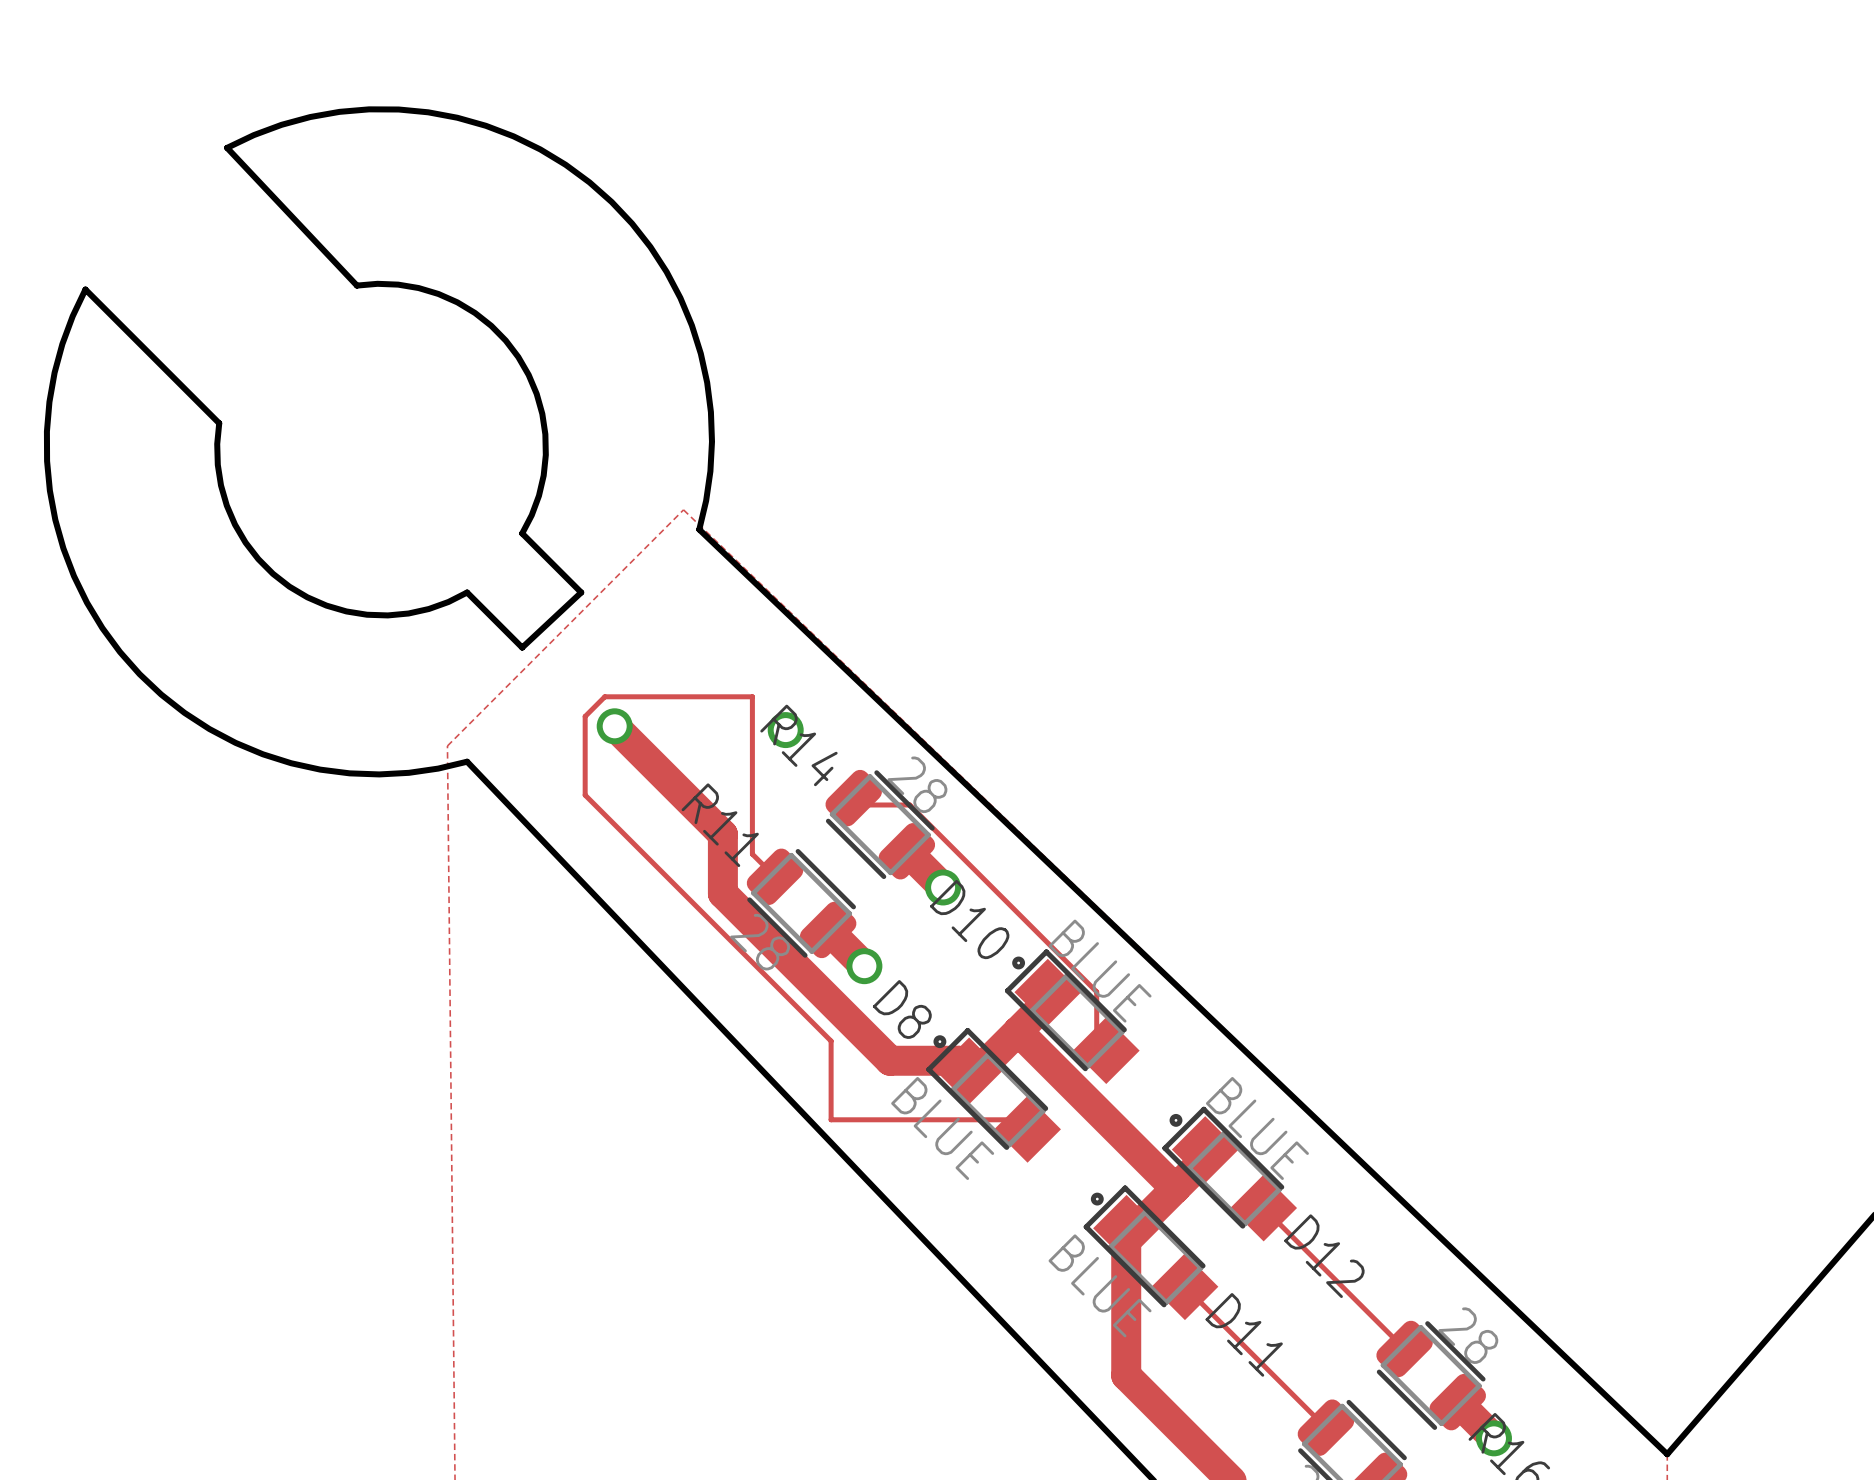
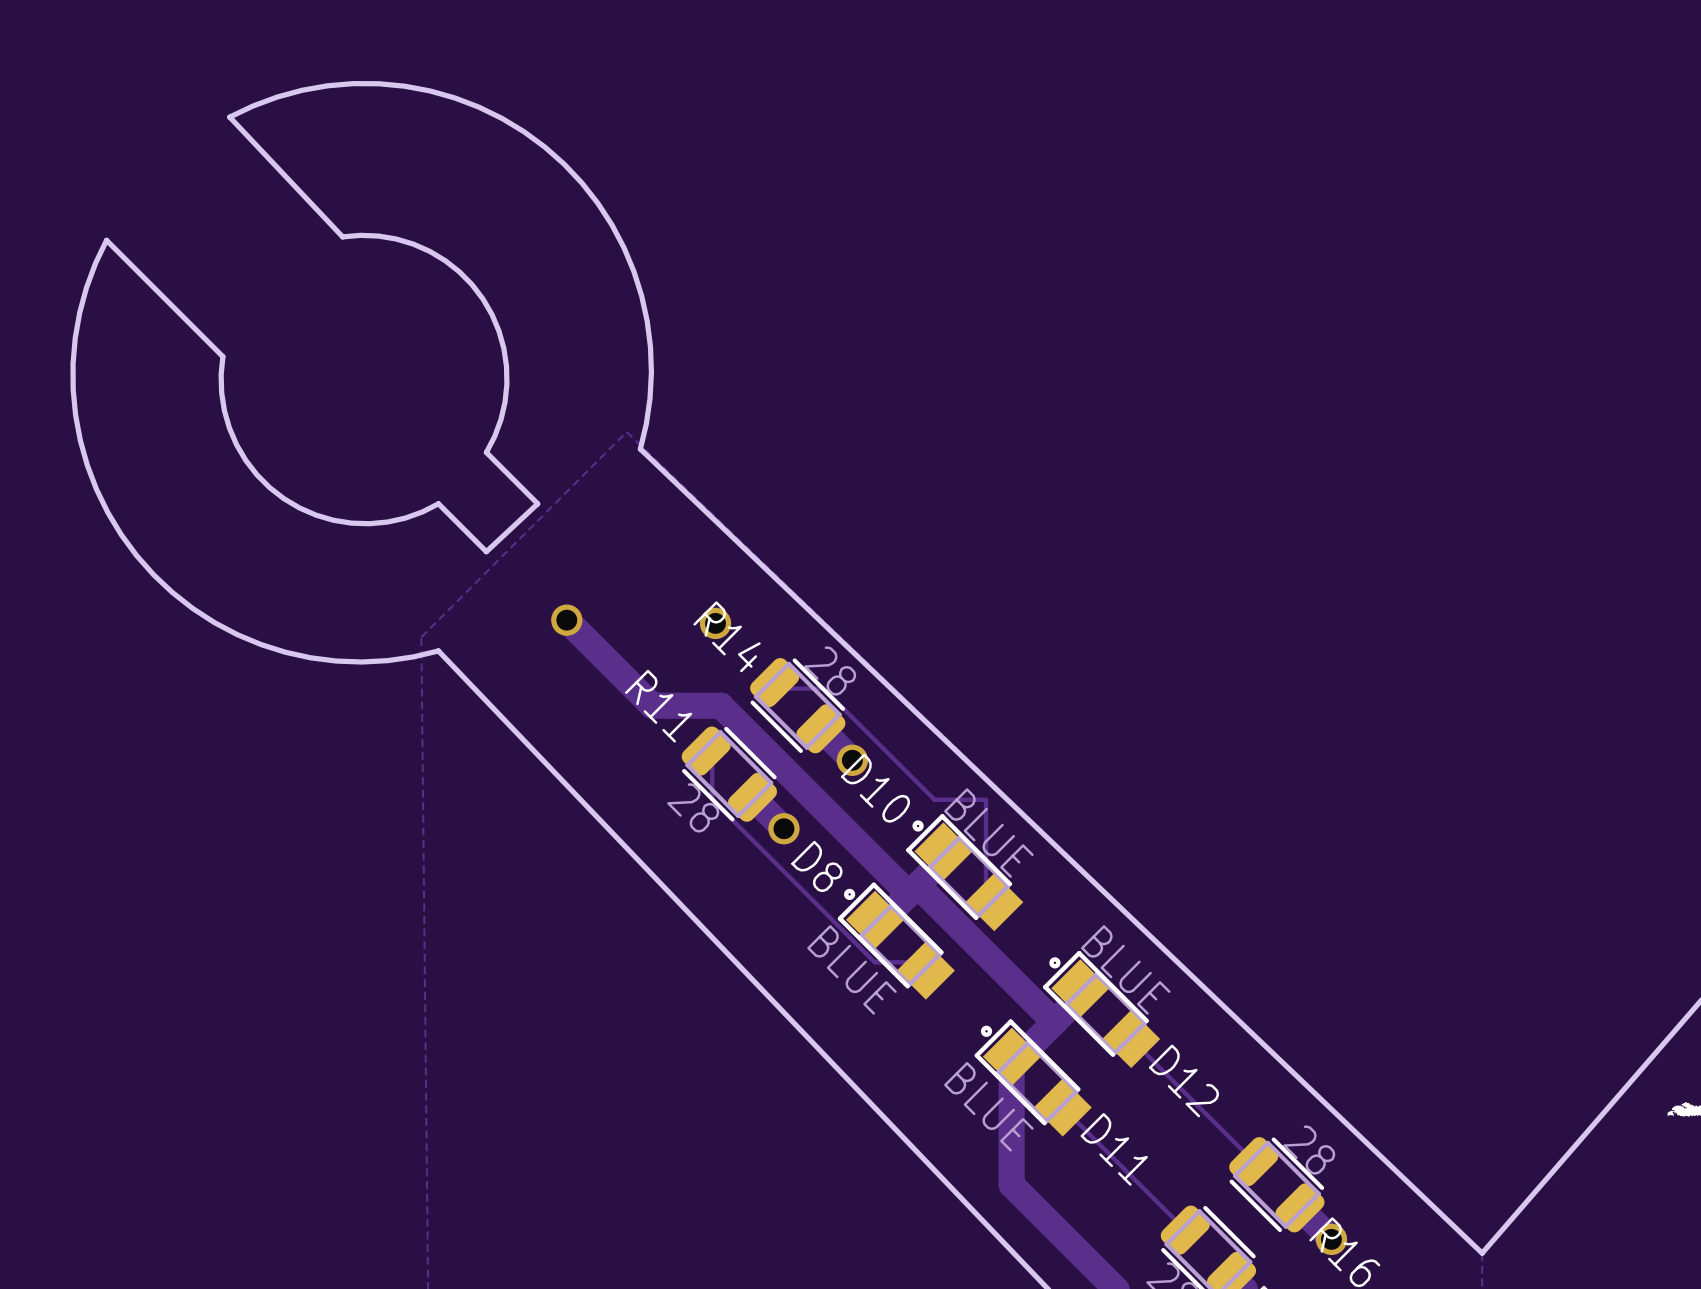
track: (713, 824) (722, 834) (722, 893) (890, 1060) (958, 1060) (969, 1070) -> (652, 705) (720, 705) (908, 893)
track: (775, 876) (752, 854) (752, 696) (604, 696) (585, 716) (585, 795) (831, 1041) (831, 1119) (968, 1119) -> (706, 751) (712, 757) (712, 799) (874, 962)
track: (1037, 932) (1096, 991) -> (934, 799) (985, 799) (985, 851)

